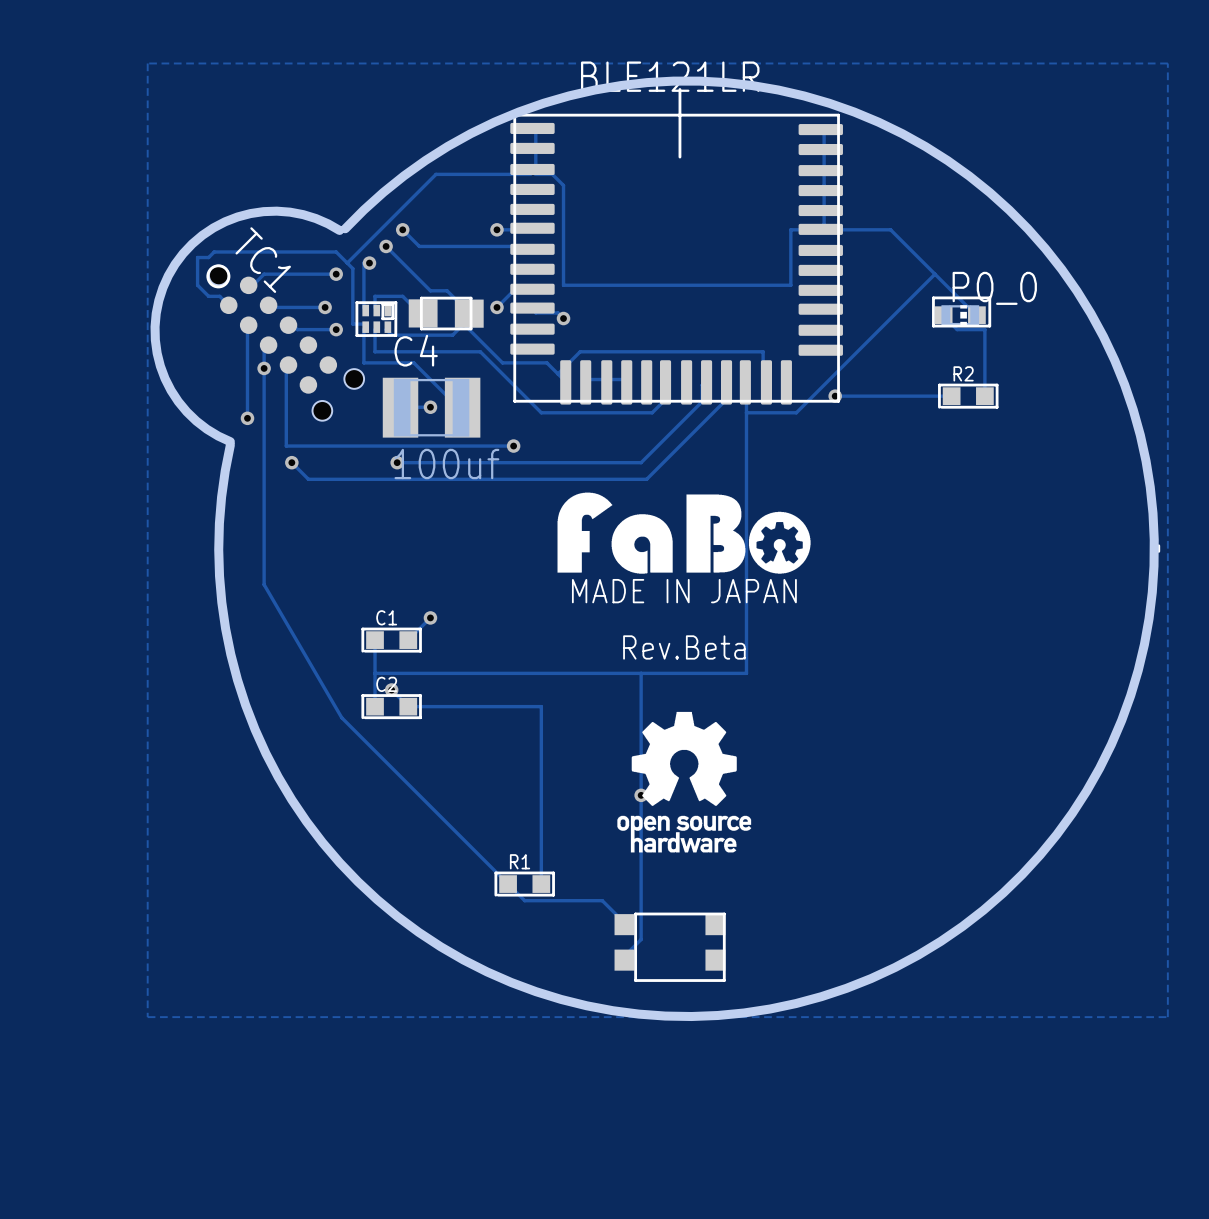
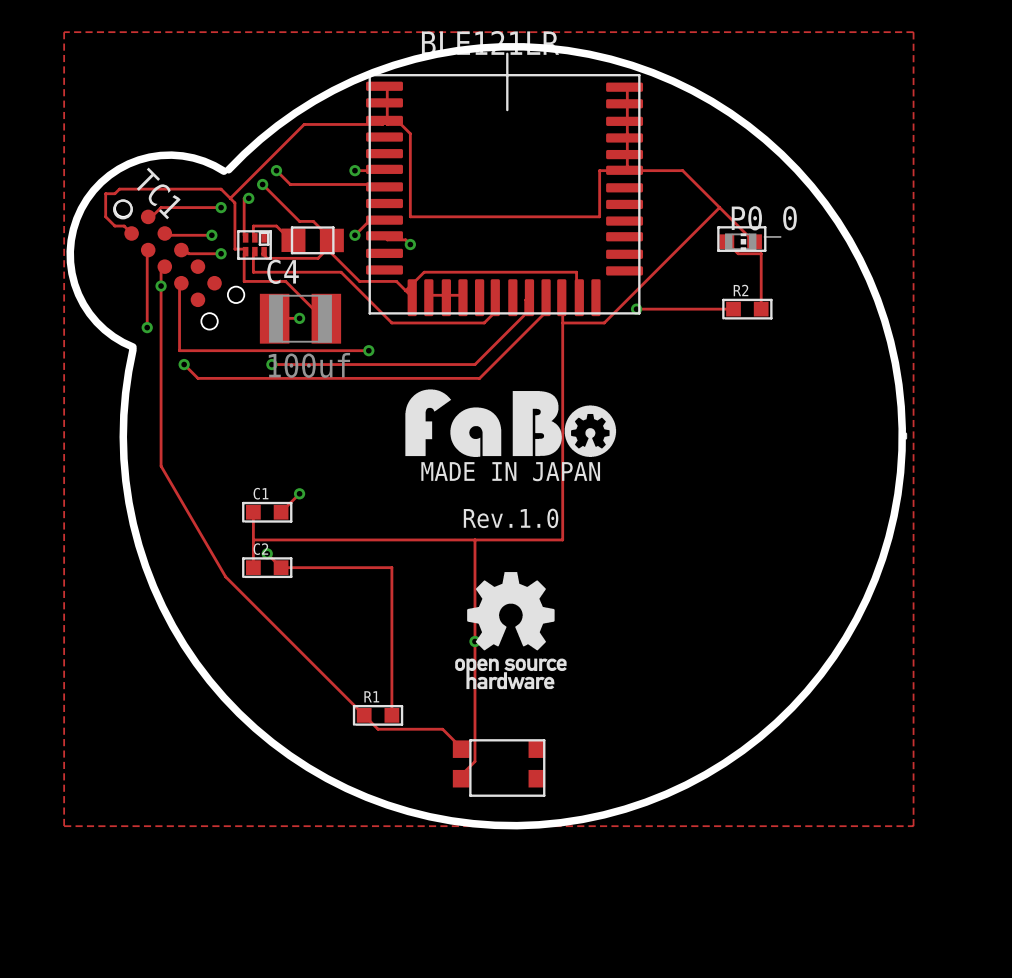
text: Rev.Beta (684, 647) -> Rev.1.0 (511, 518)

